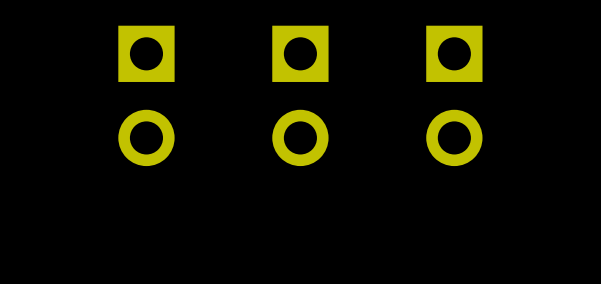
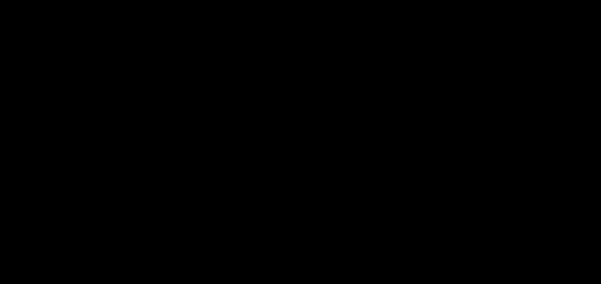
part: (146, 95) -> none
part: (300, 95) -> none
part: (454, 95) -> none

